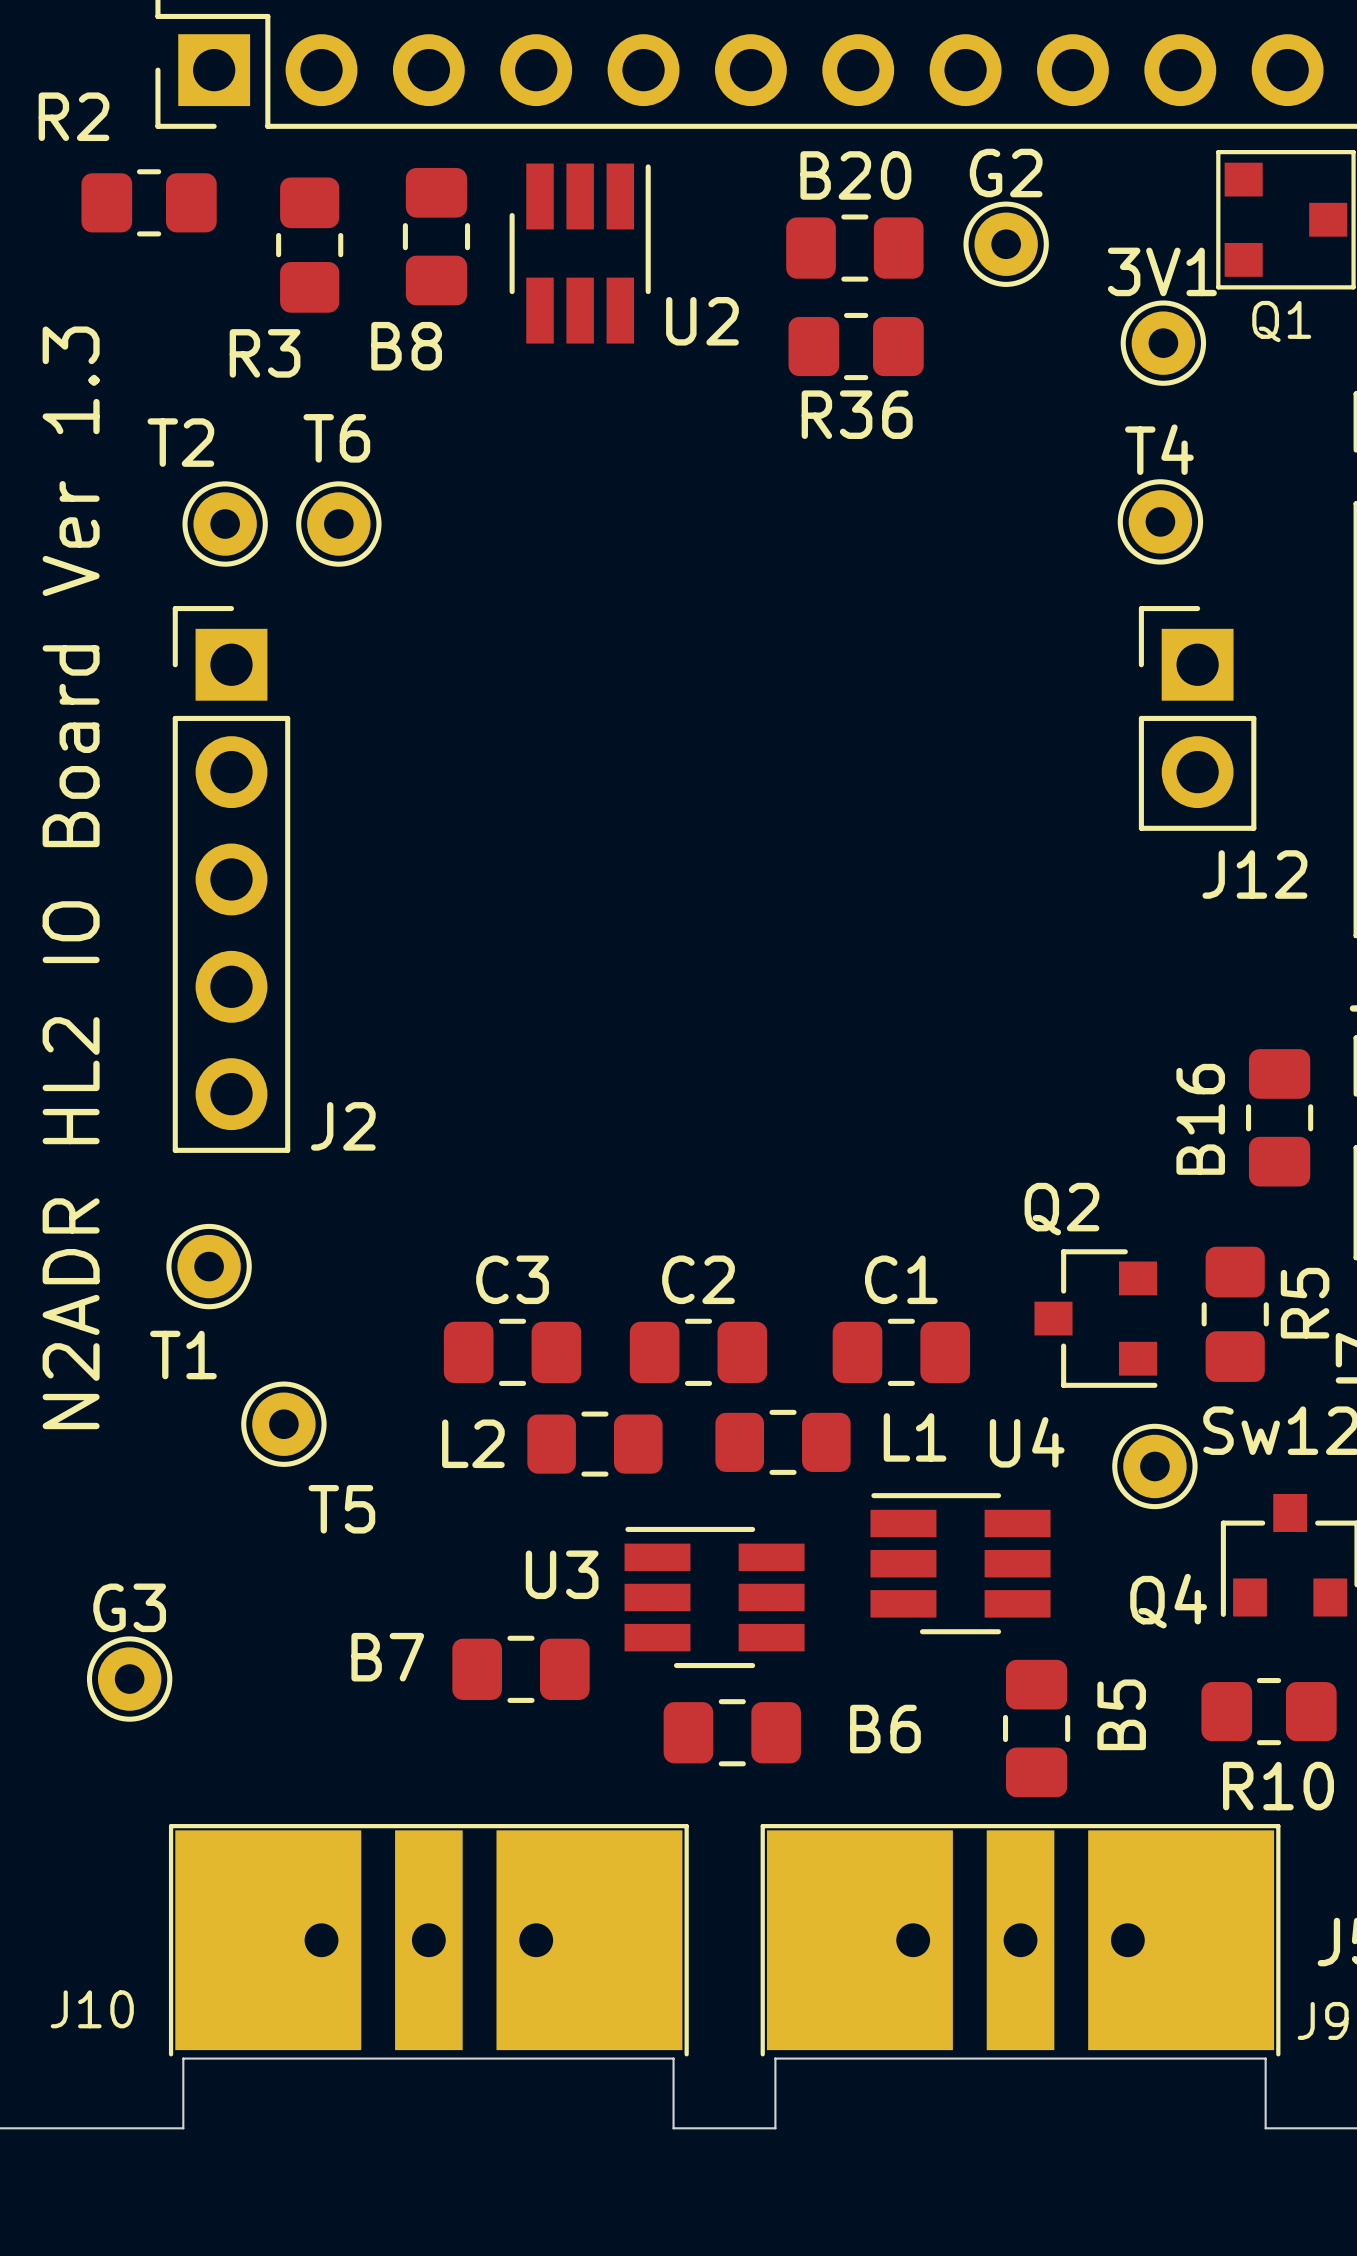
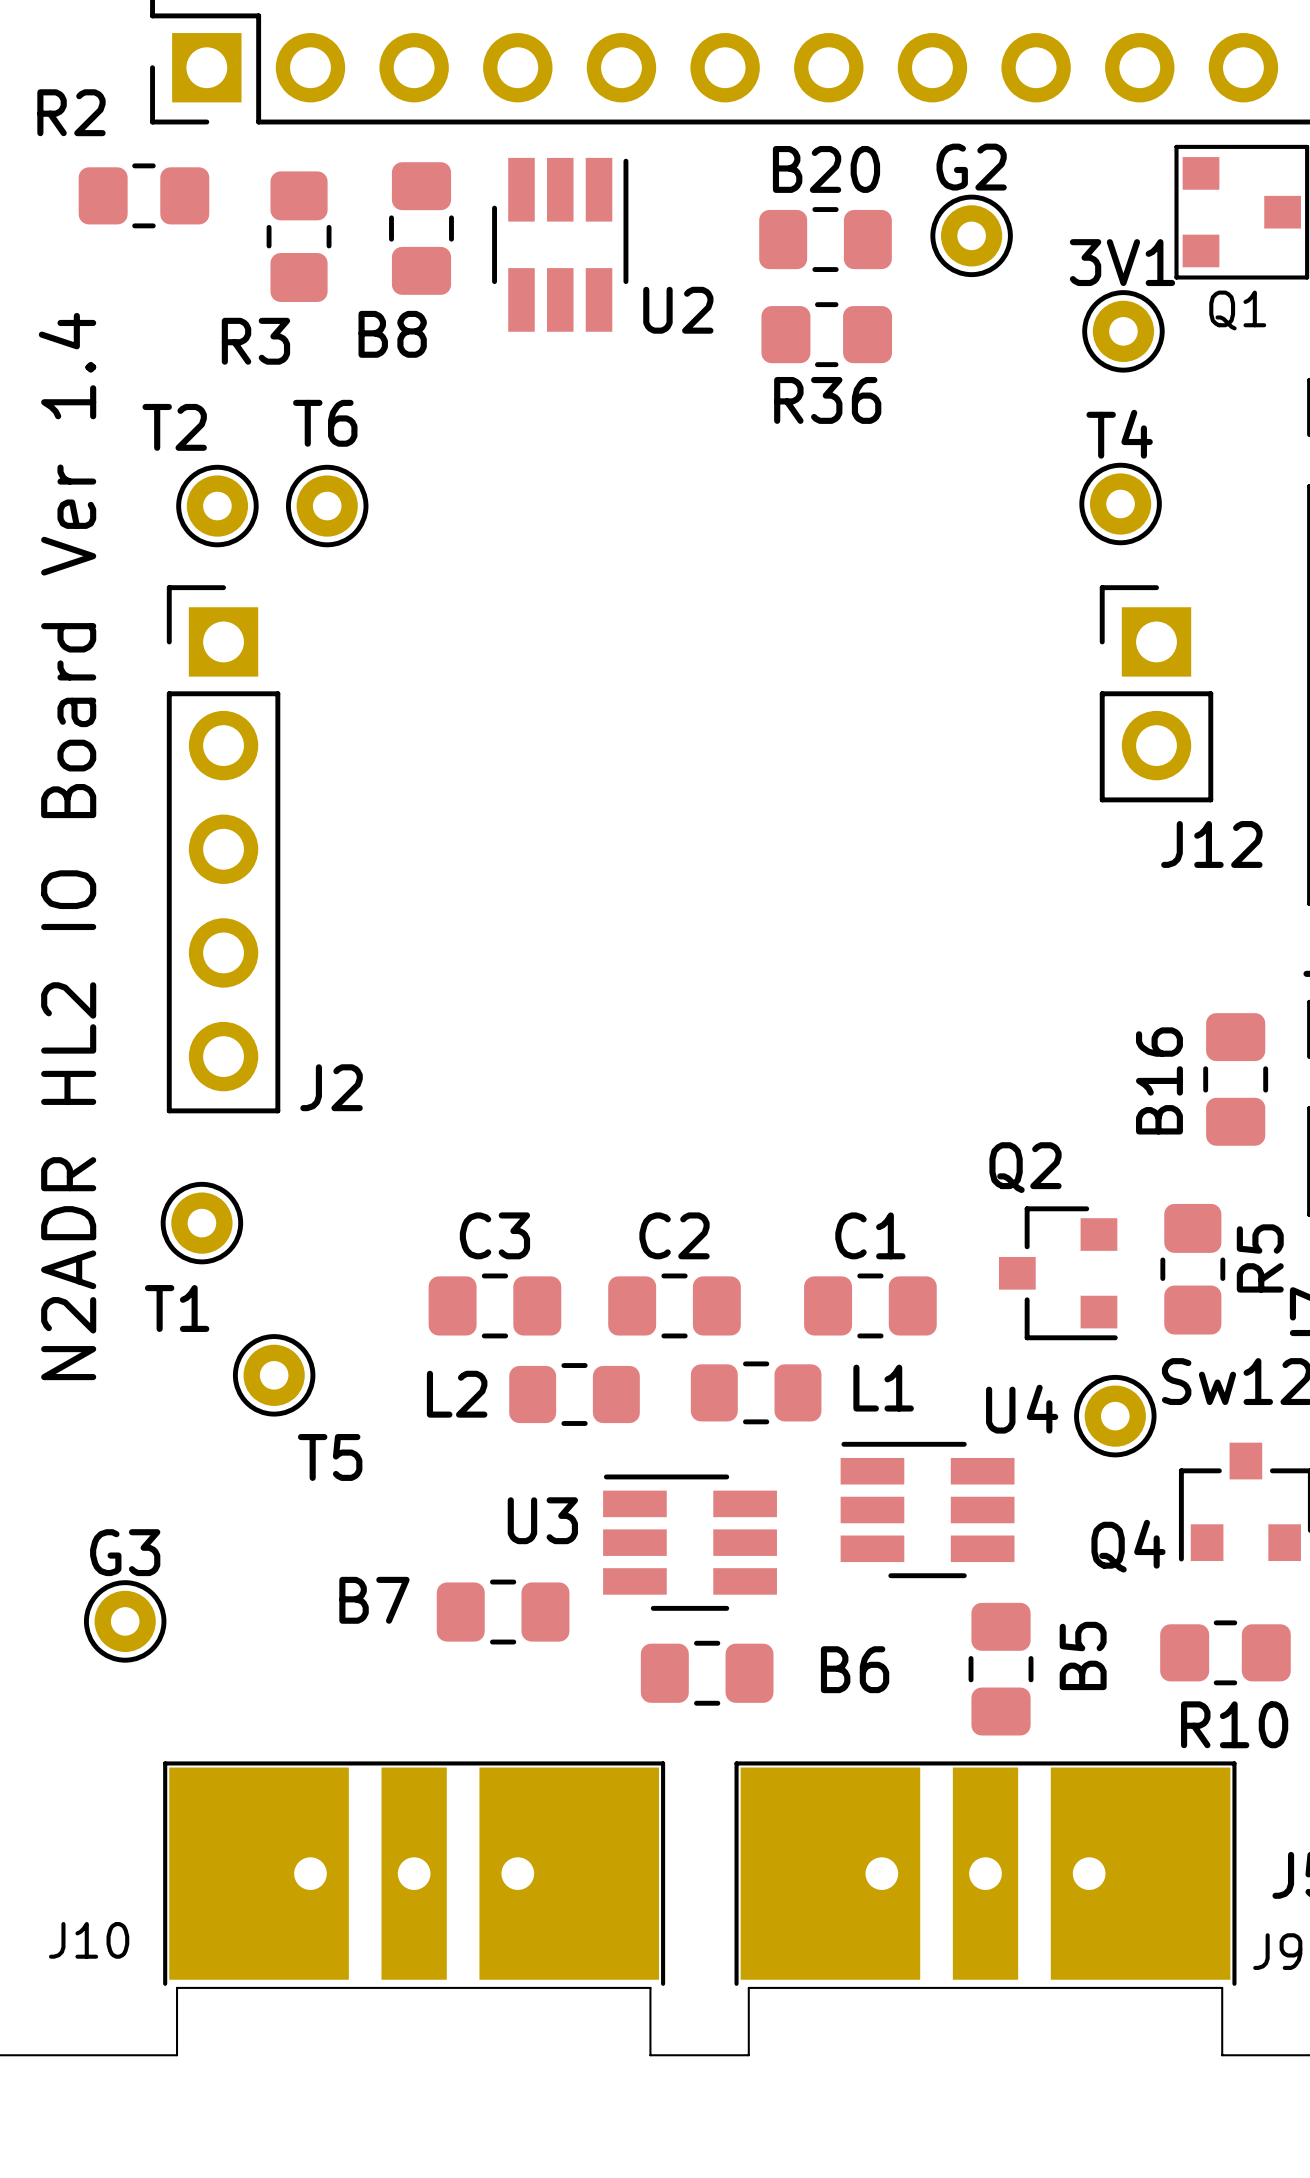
text: N2ADR HL2 IO Board Ver 1.3 (71, 877) -> N2ADR HL2 IO Board Ver 1.4 (67, 846)
U4 name position: U4 (1027, 1442) -> U4 (1022, 1409)

